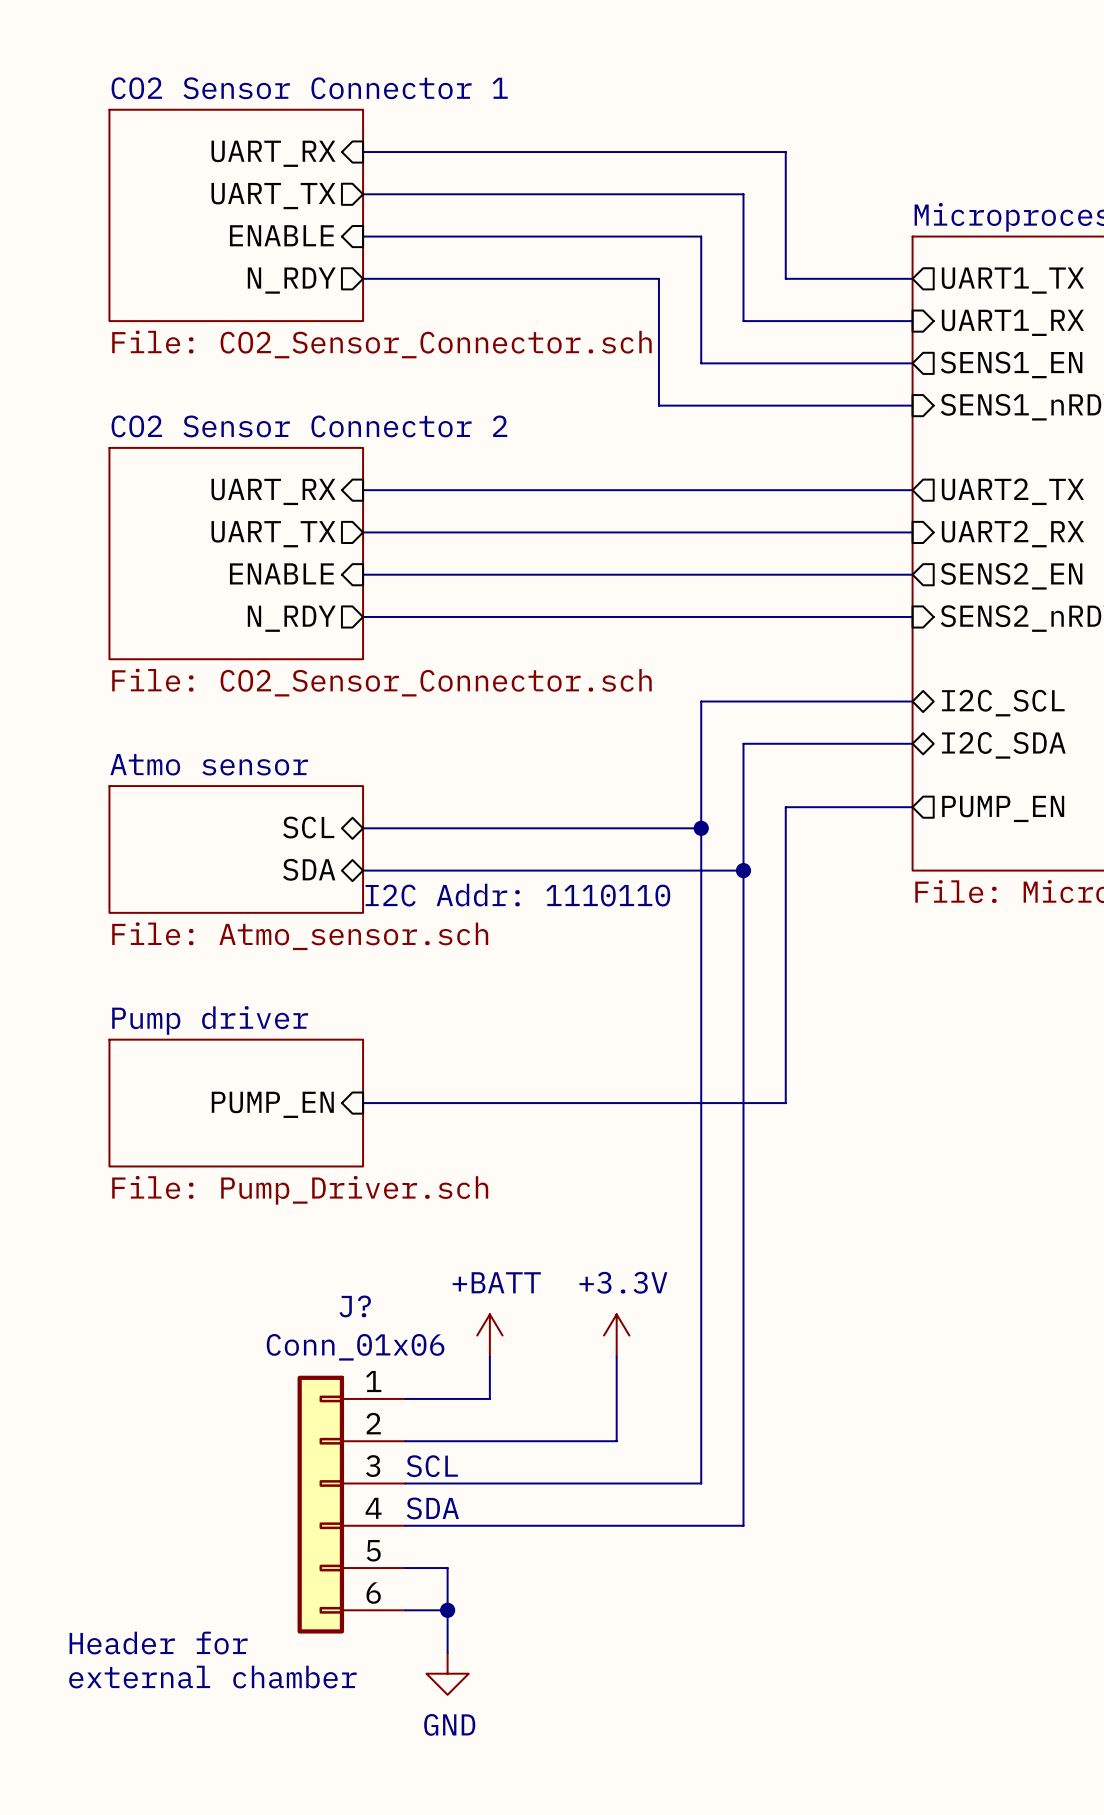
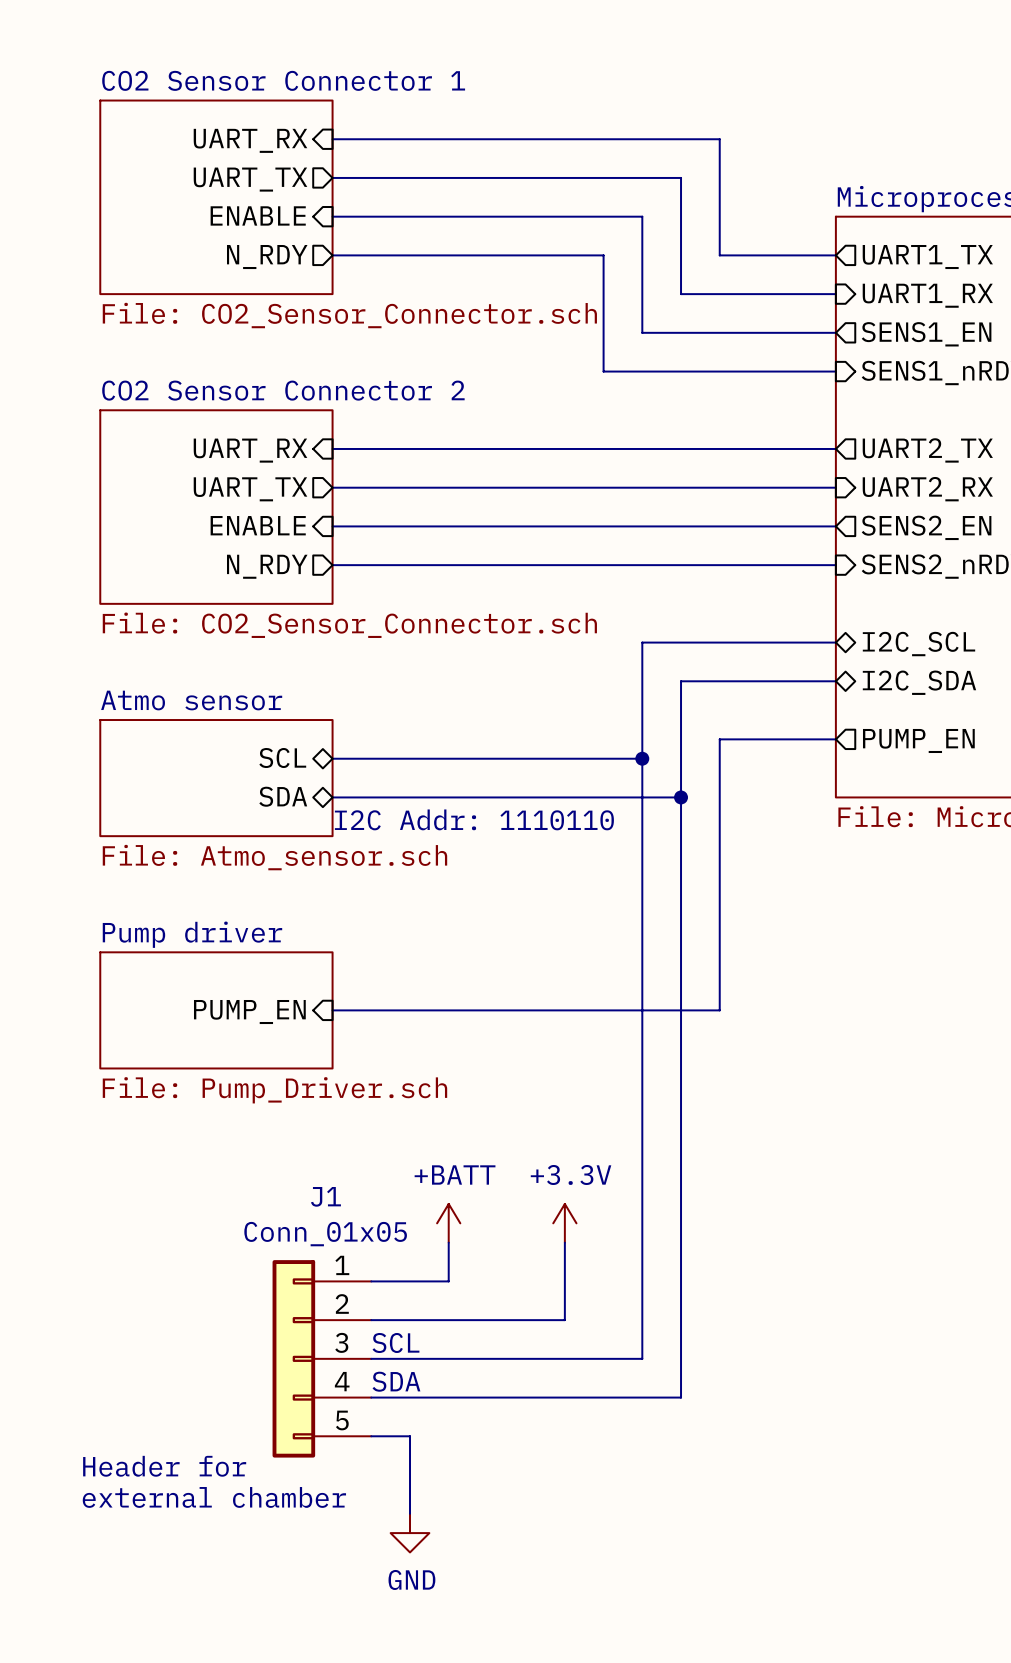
J1: none -> Conn_01x05 (321, 1358)
J?: Conn_01x06 (351, 1504) -> none
wire: (405, 1610) (447, 1610) -> none
junction: (447, 1610) -> none
text position: Header for (158, 1643) -> Header for (164, 1466)
text position: external chamber (212, 1677) -> external chamber (214, 1497)

